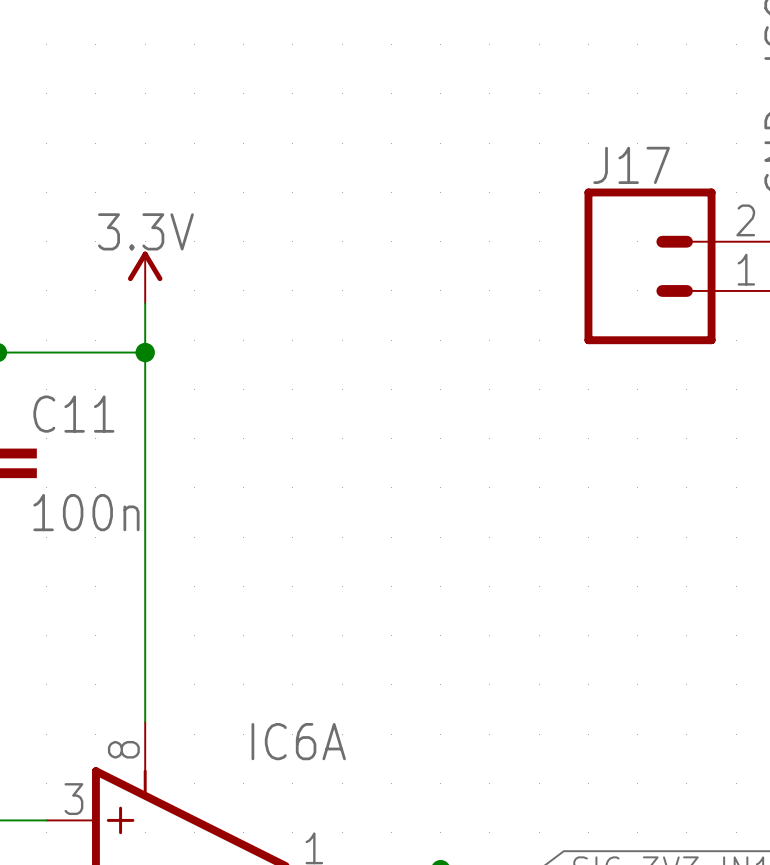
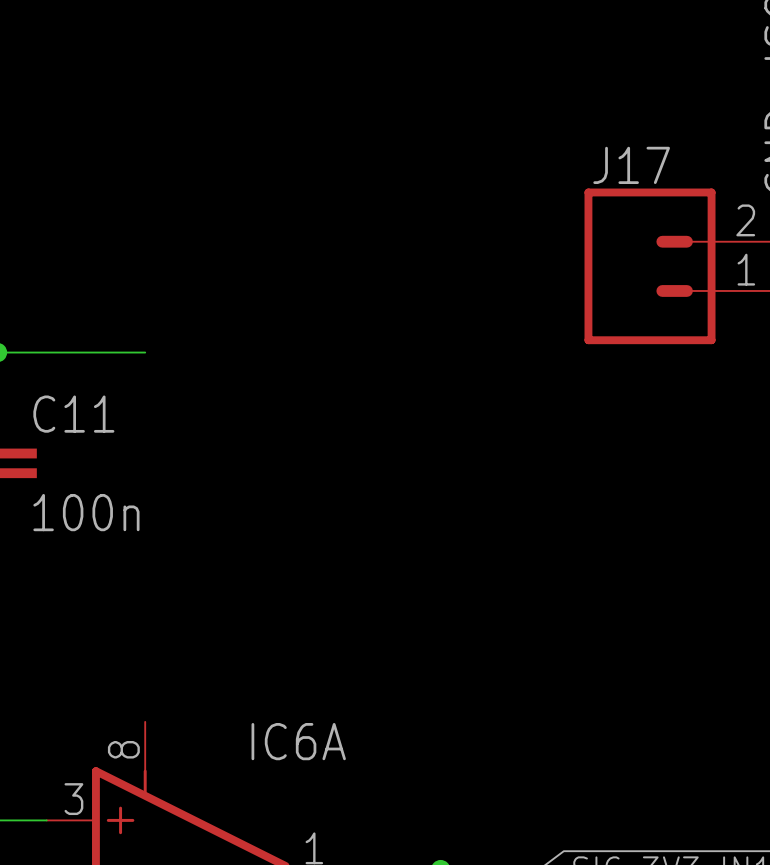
power symbol: 3.3V (145, 277) -> none
wire: (145, 303) (145, 721) -> none
junction: (145, 352) -> none

